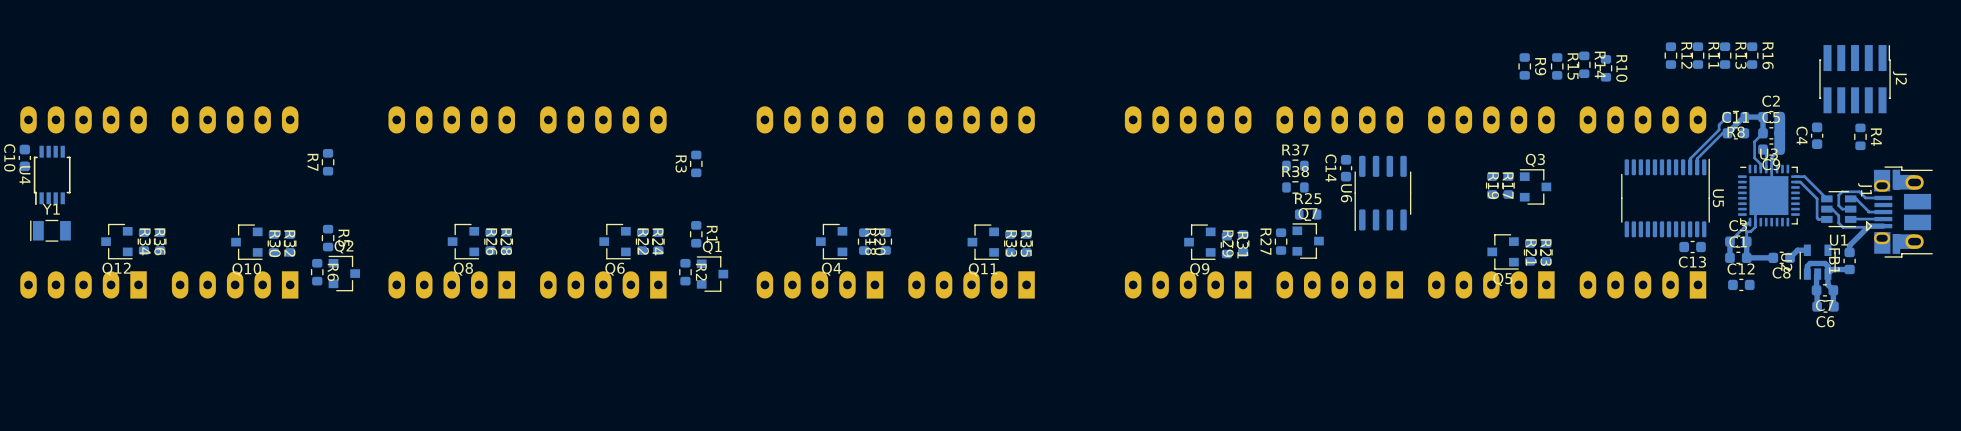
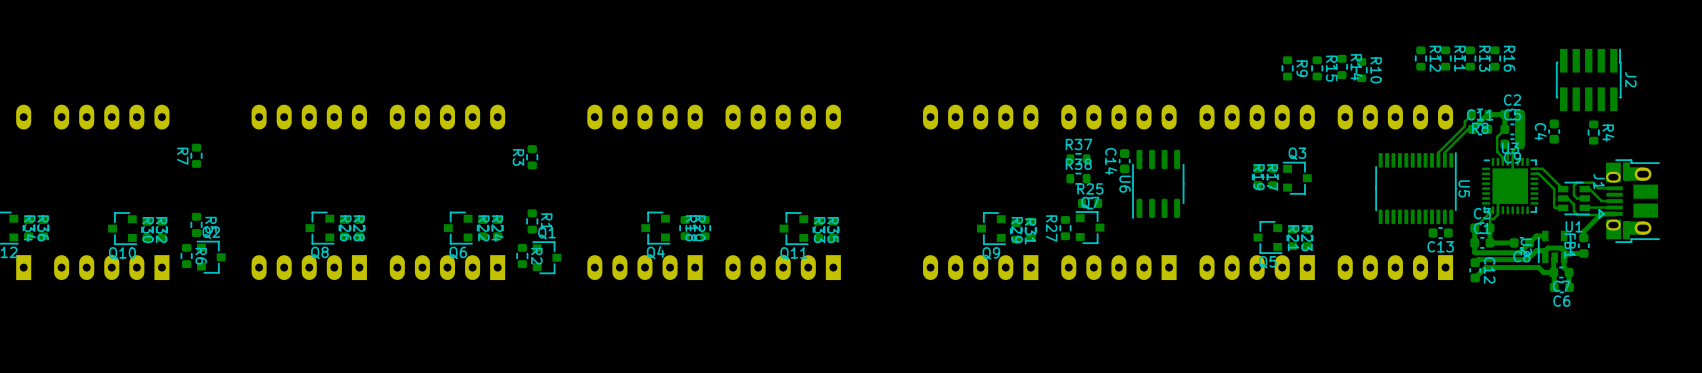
track: none -> (1529, 242) (1519, 252) (1475, 252) (1474, 242)
track: none -> (1545, 250) (1536, 250) (1527, 259) (1478, 259) (1475, 262)
C12 rotation: 0° (1741, 284) -> 90° clockwise (1475, 270)
track: none -> (1553, 272) (1543, 272) (1538, 267) (1485, 267) (1475, 277)

